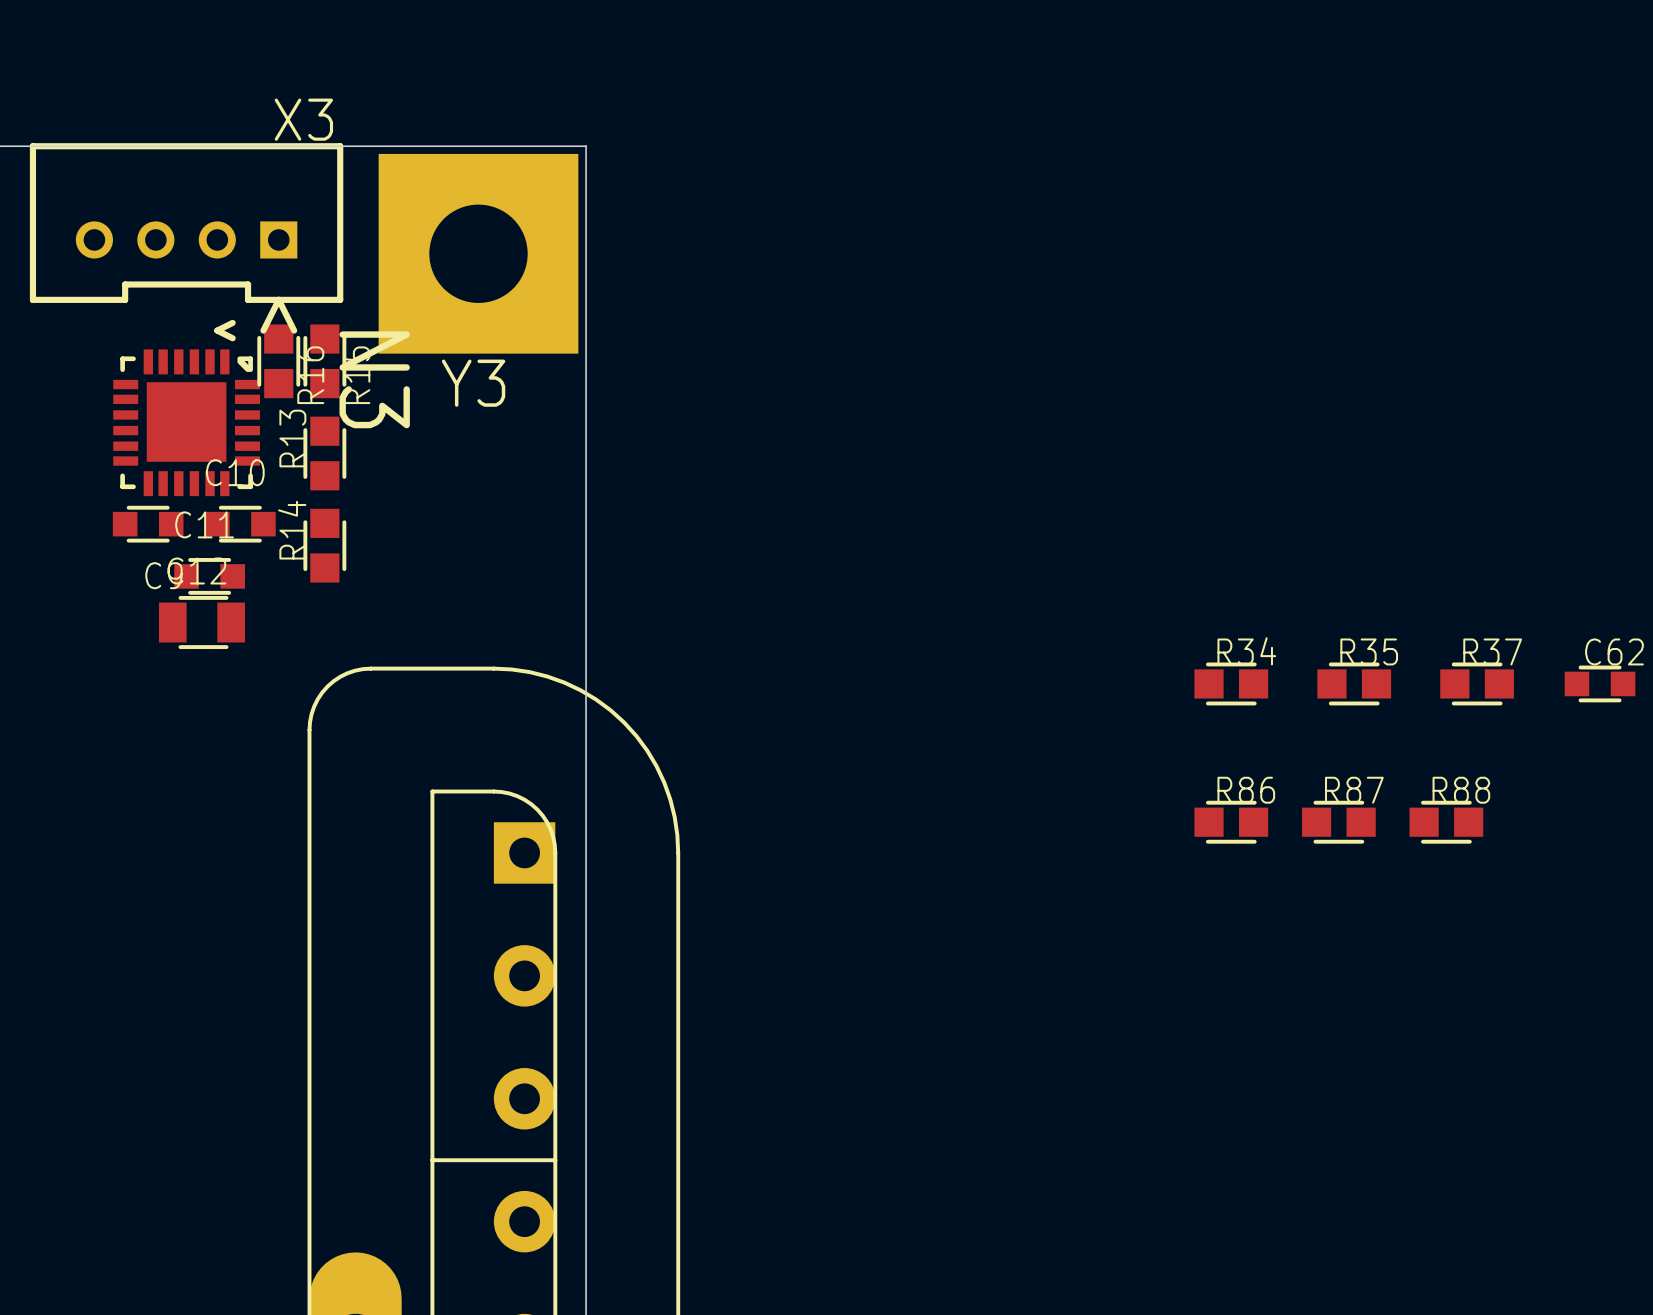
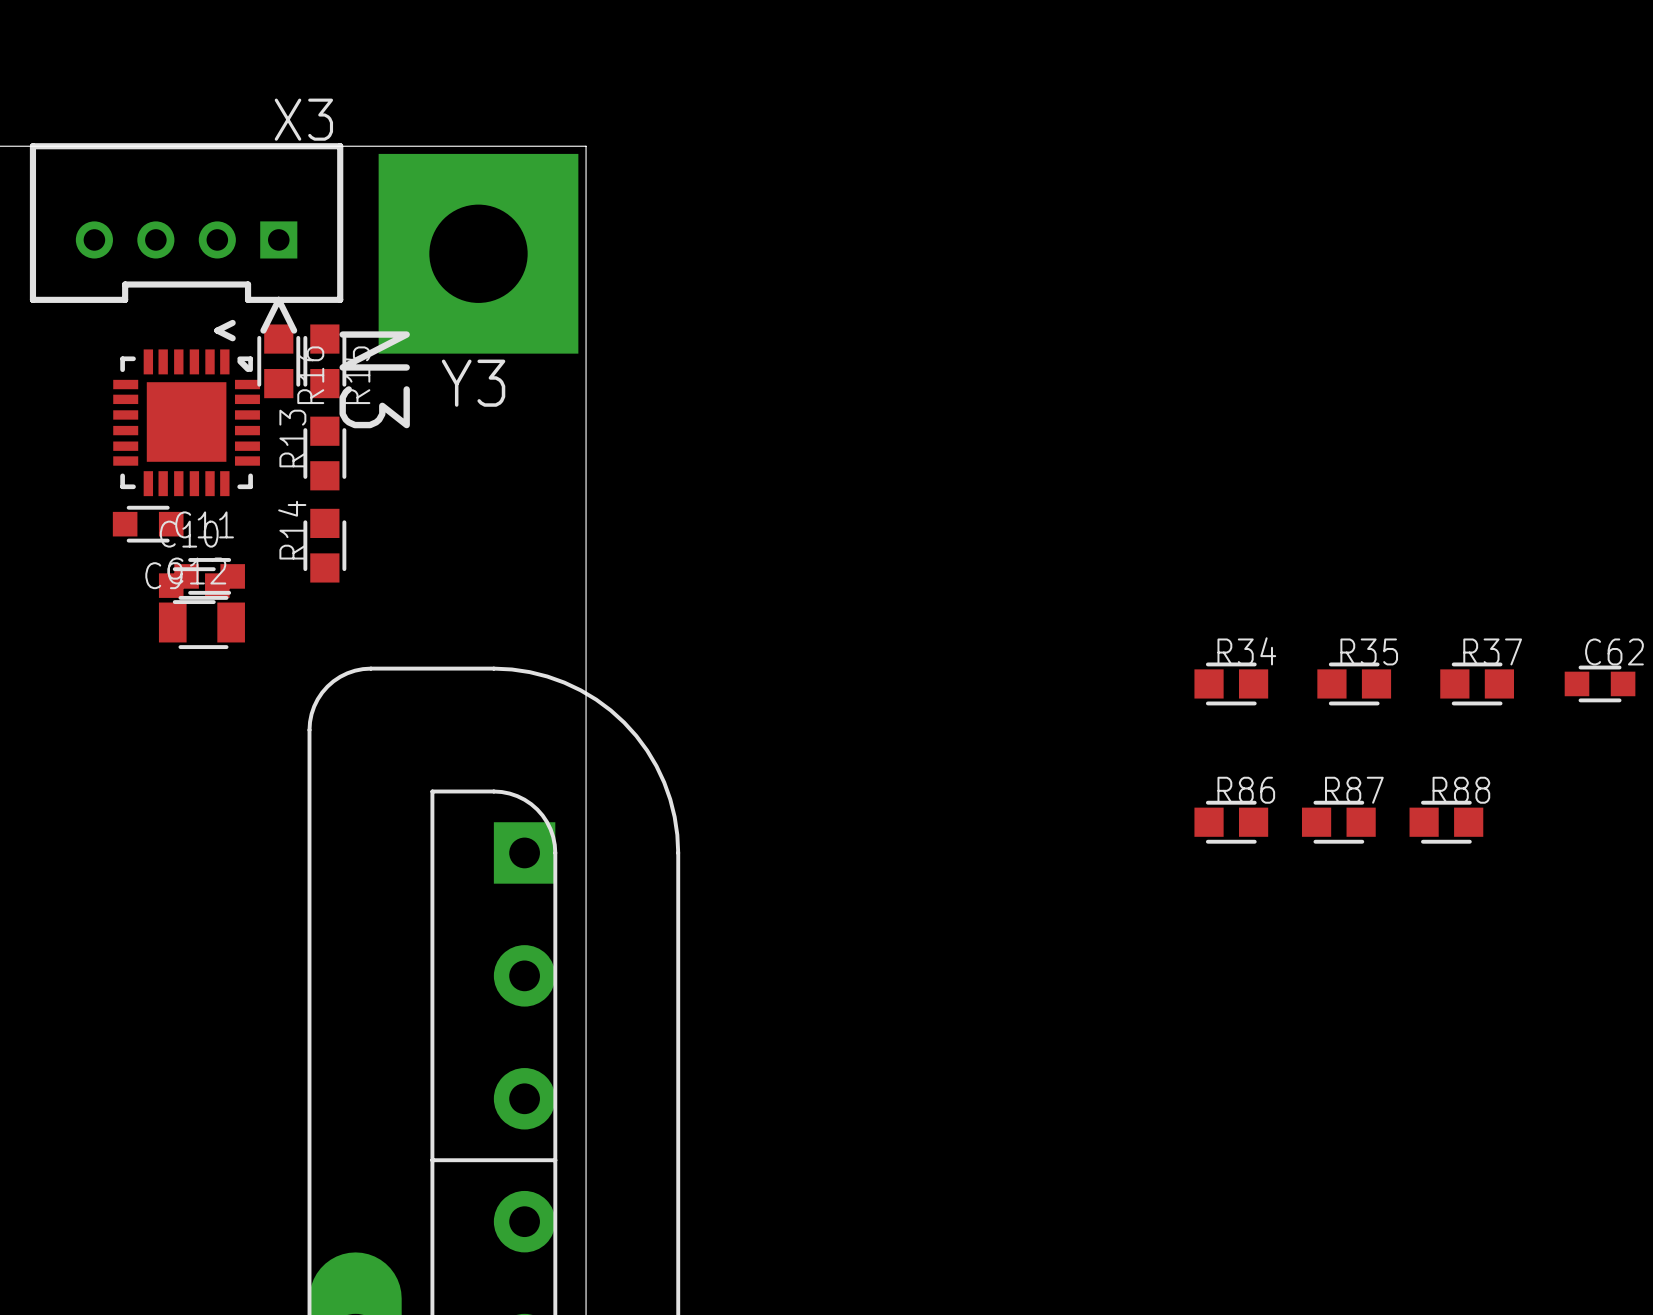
C10 position: (240, 524) -> (194, 585)

